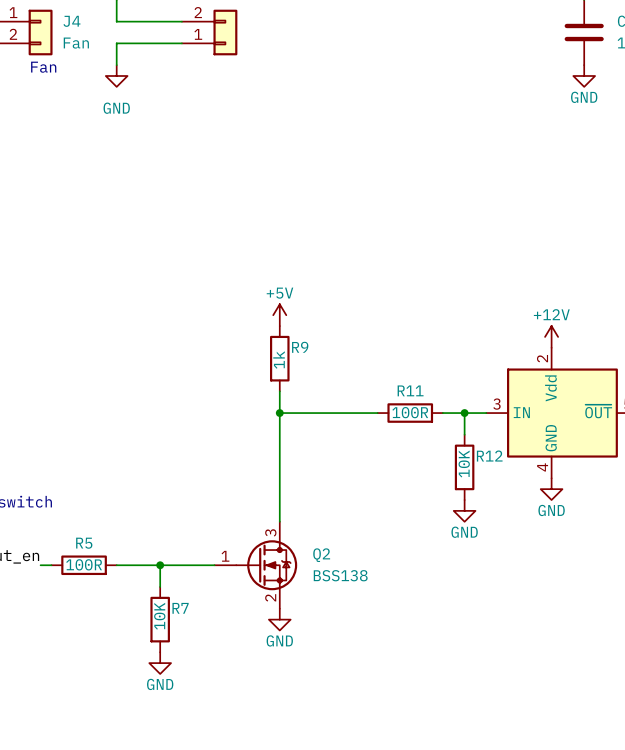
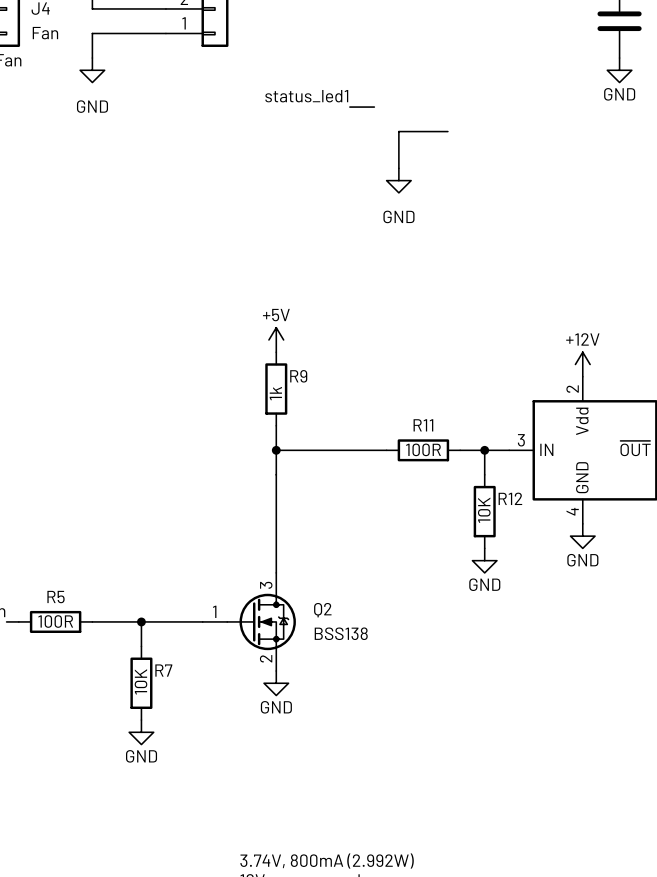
label: none -> status_led1 (306, 96)
wire: none -> (349, 107) (374, 107)
wire: none -> (447, 131) (398, 131) (398, 168)
power symbol: none -> GND (398, 180)

